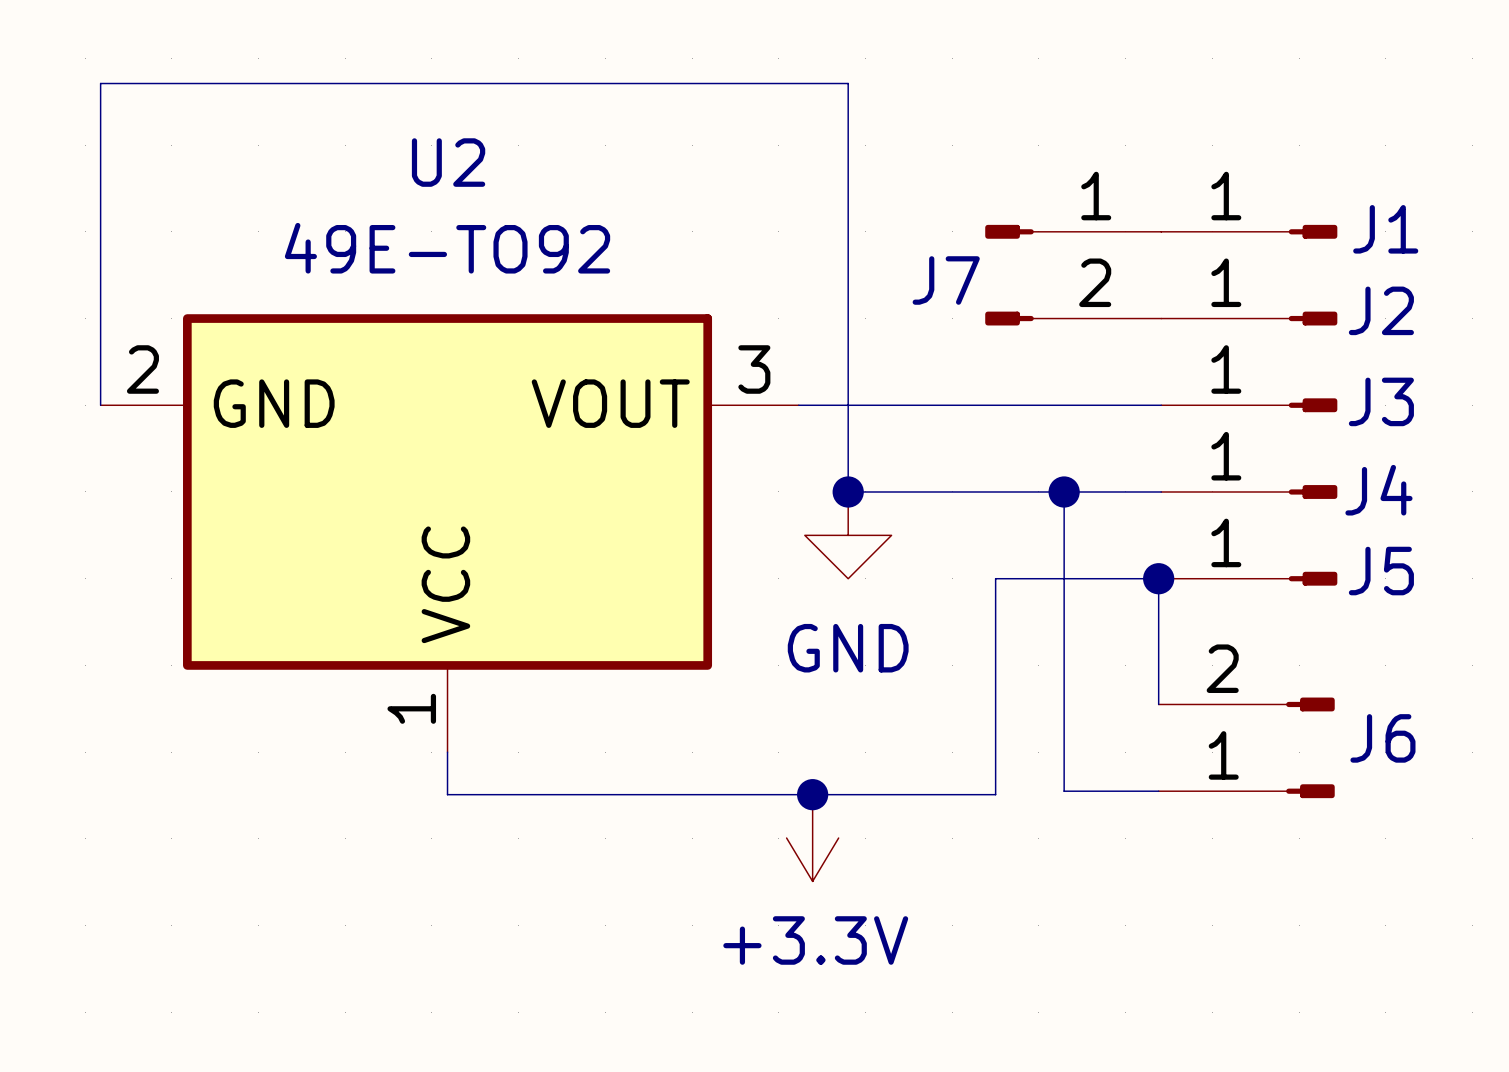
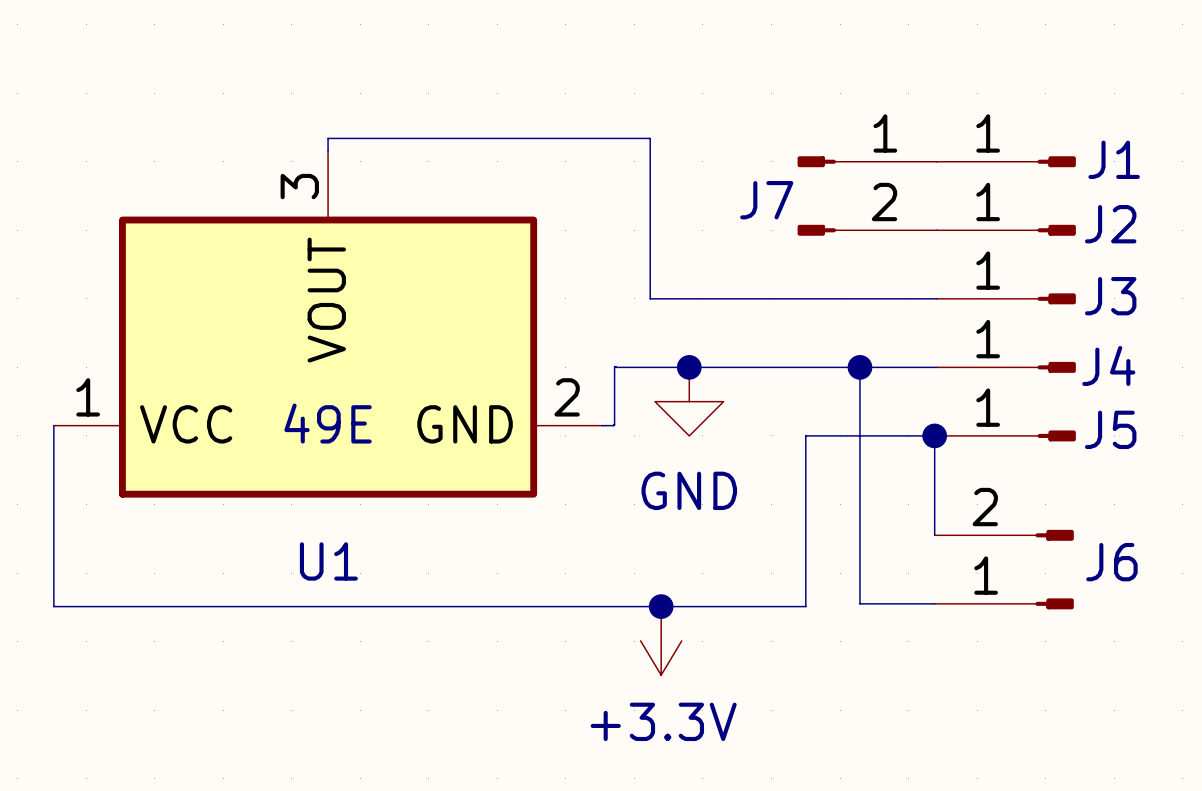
wire: none -> (328, 151) (328, 138) (650, 138) (650, 298)
wire: (100, 405) (100, 83) (848, 83) (848, 491) -> (602, 425) (614, 424) (614, 366) (689, 367)
U1: none -> 49E (328, 324)
U2: 49E-TO92 (449, 533) -> none
wire: (447, 752) (447, 794) -> (53, 425) (53, 606) (372, 606)

